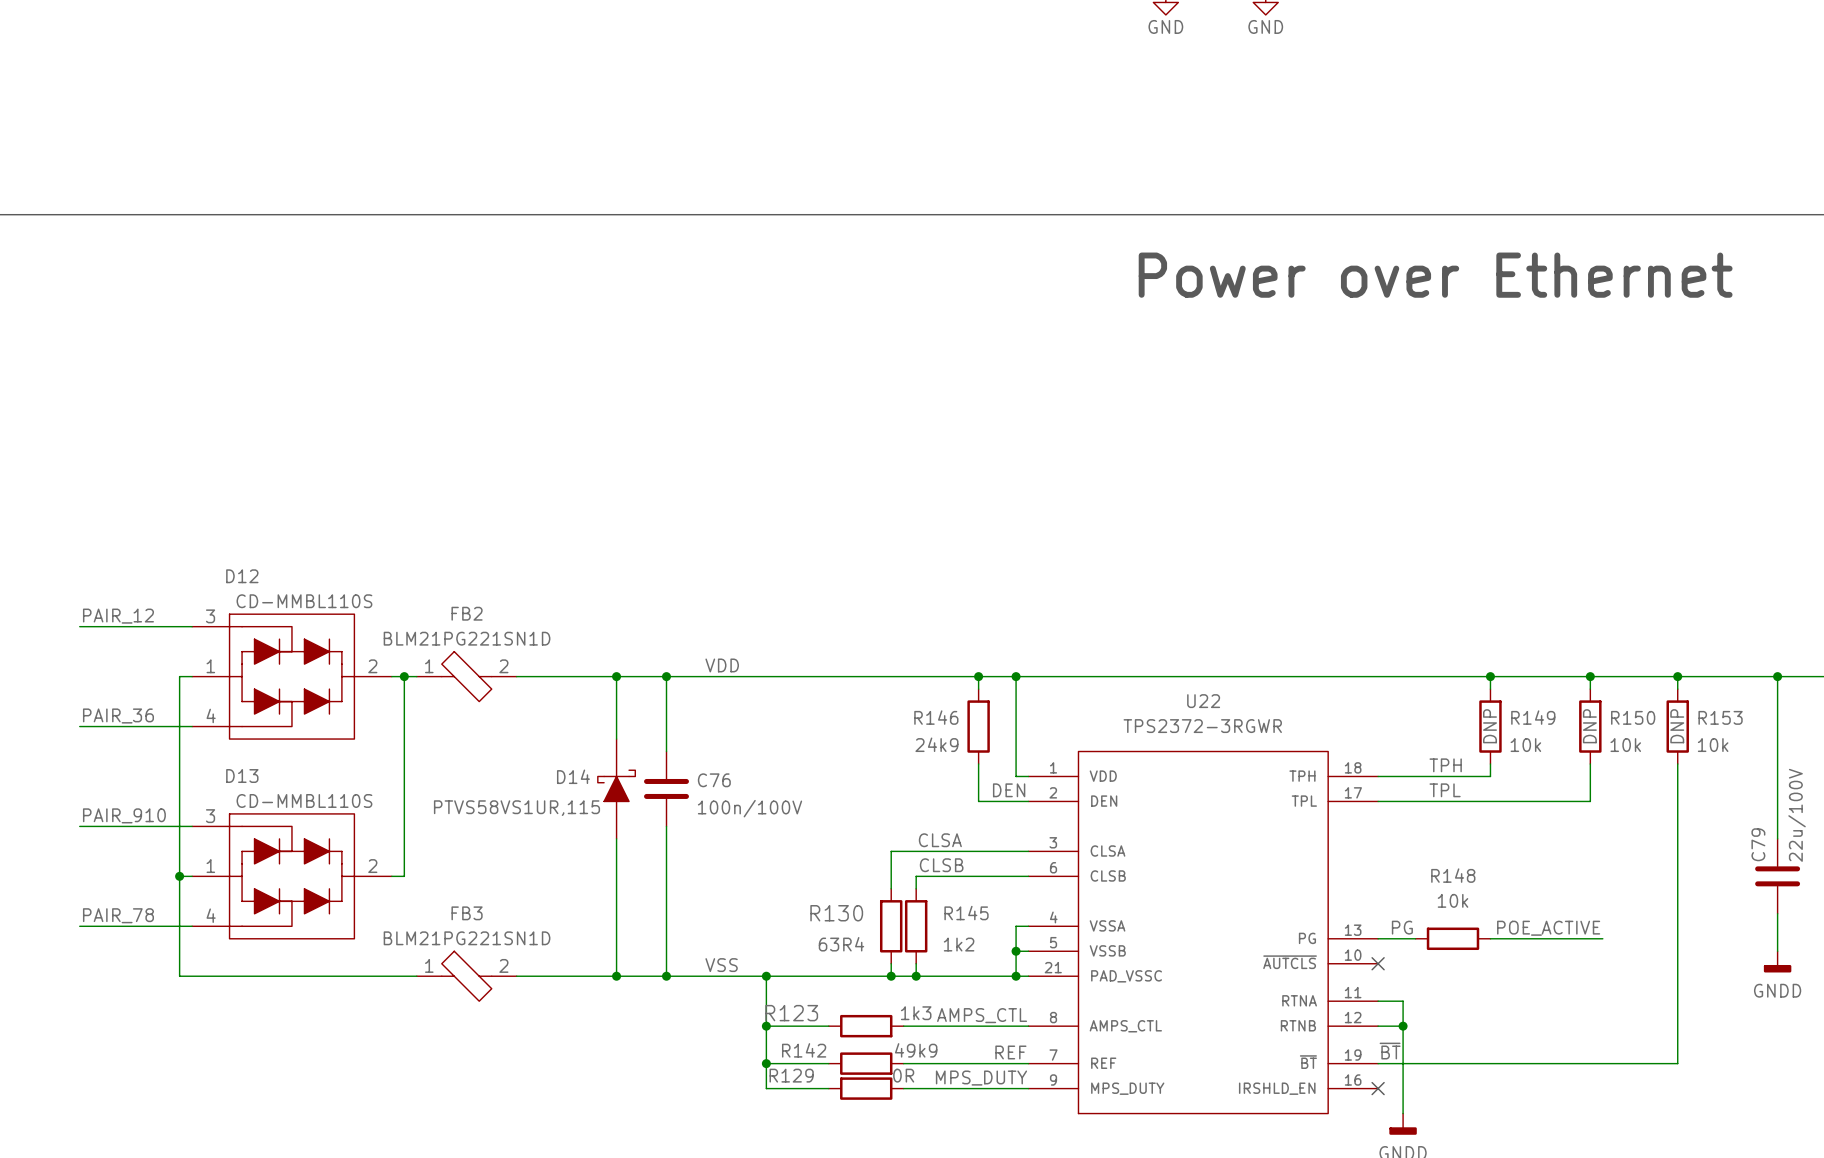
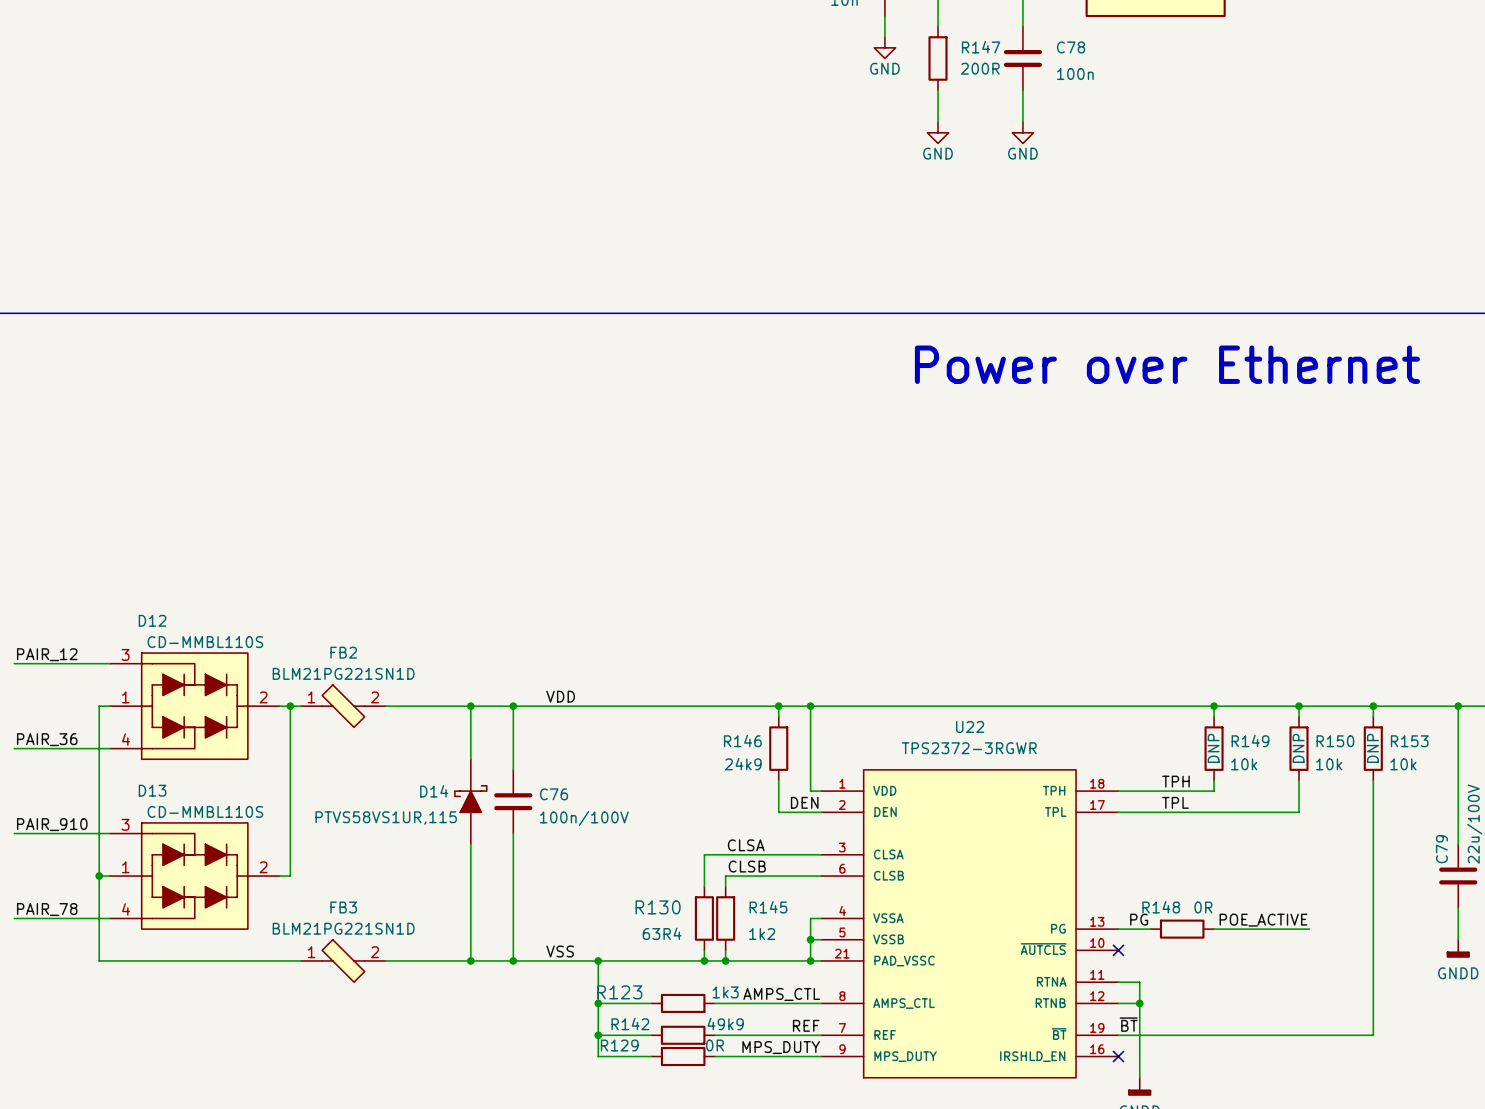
R148 name position: R148 (1453, 875) -> R148 (1161, 907)
R148 text: 10k (1453, 900) -> 0R (1203, 907)

